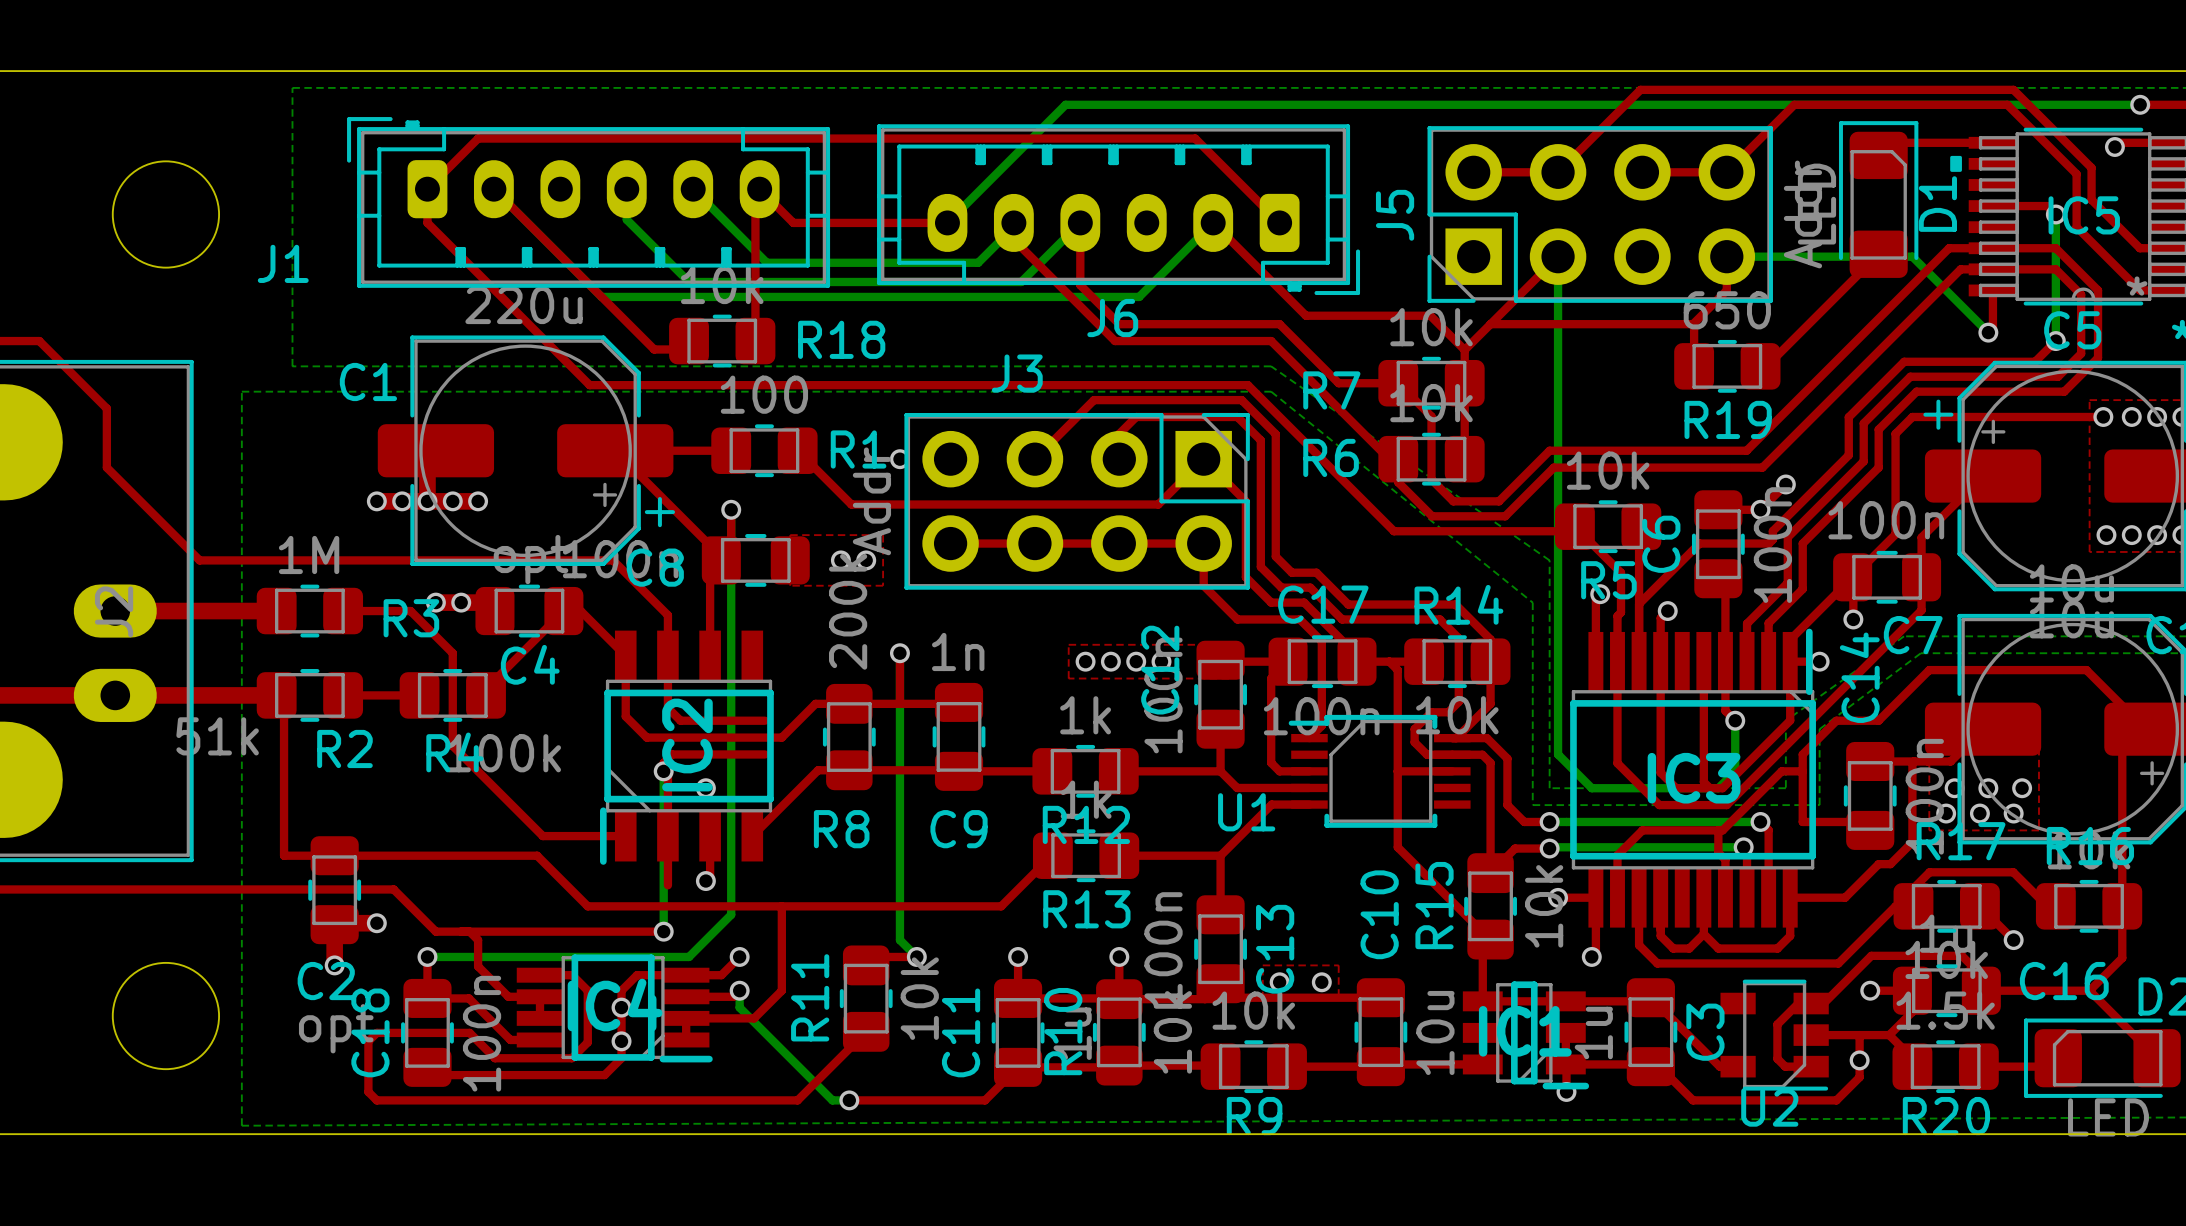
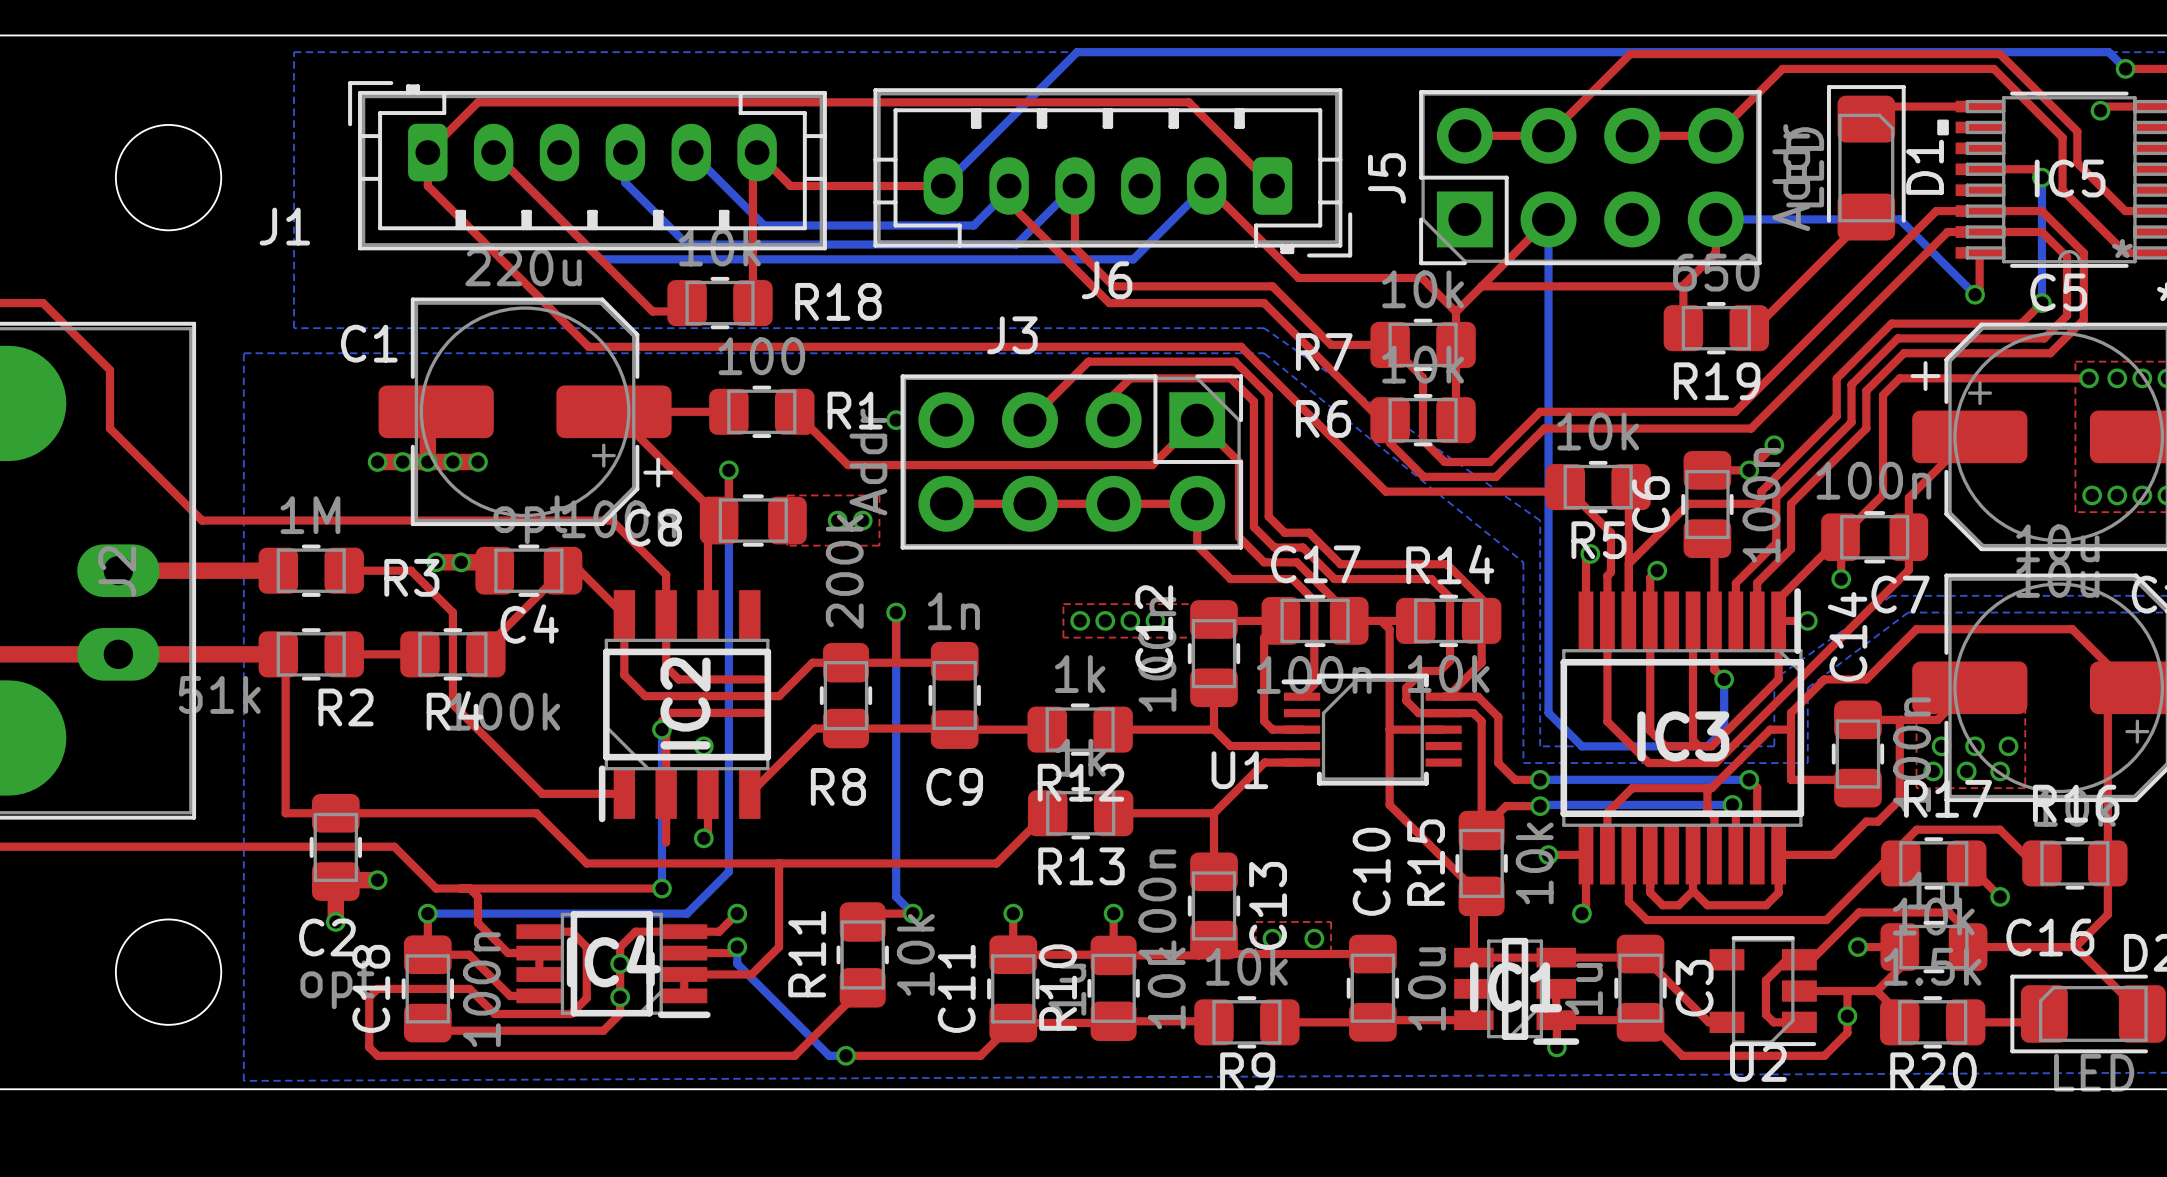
bottom track: (1065, 104) (2140, 104) -> (1060, 68) (1077, 52) (2108, 52) (2125, 68)

